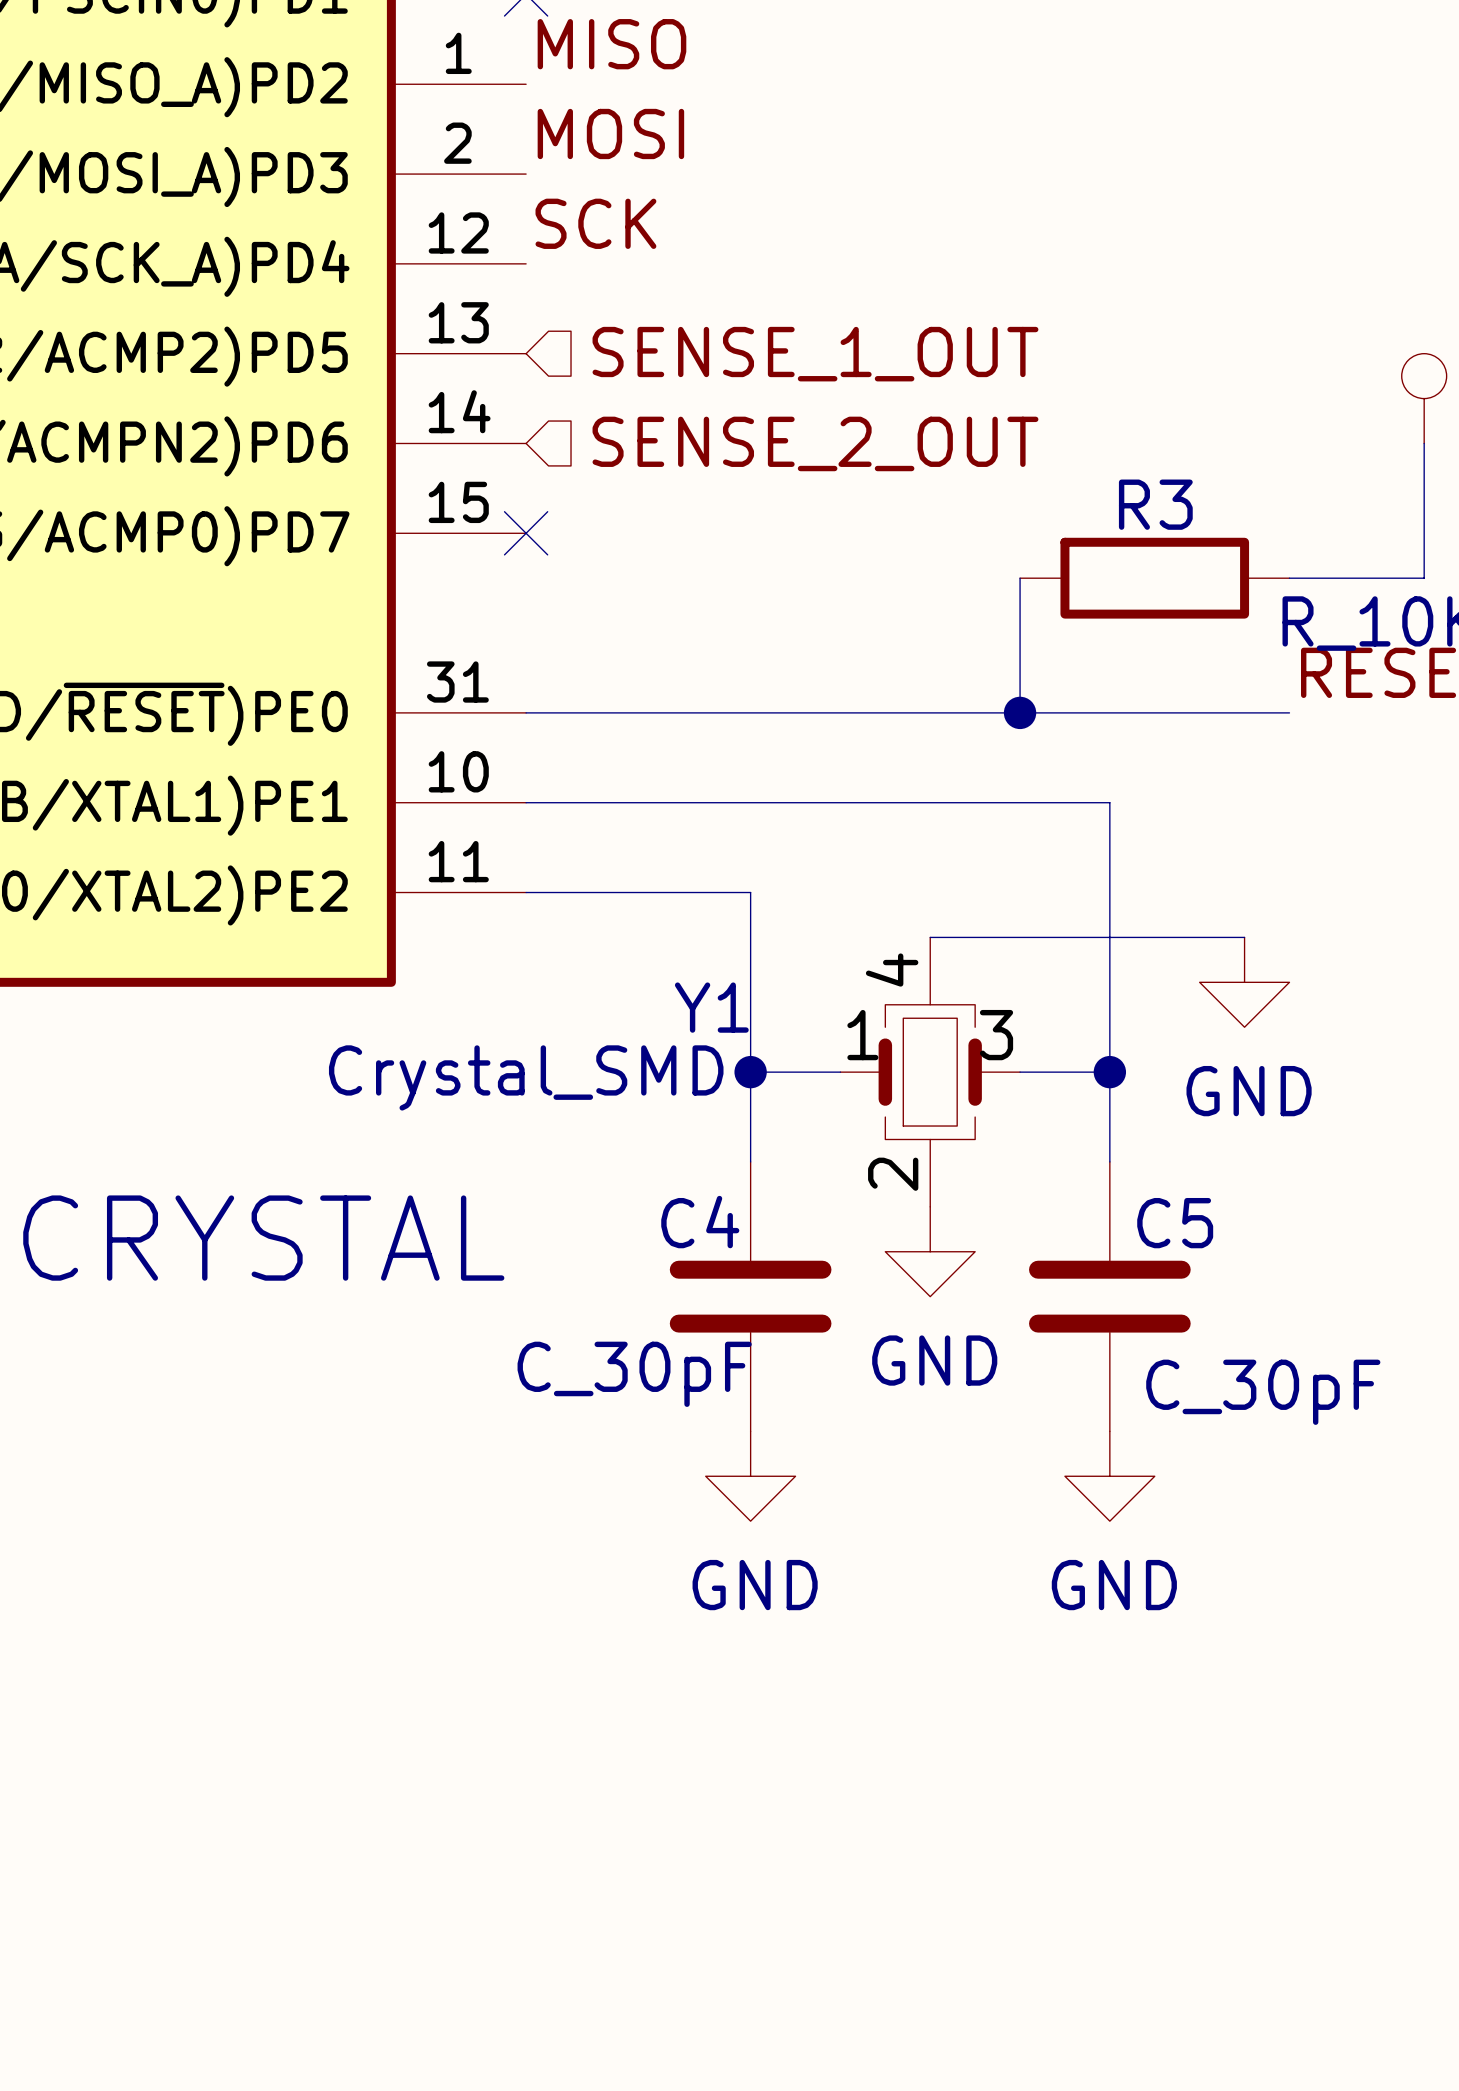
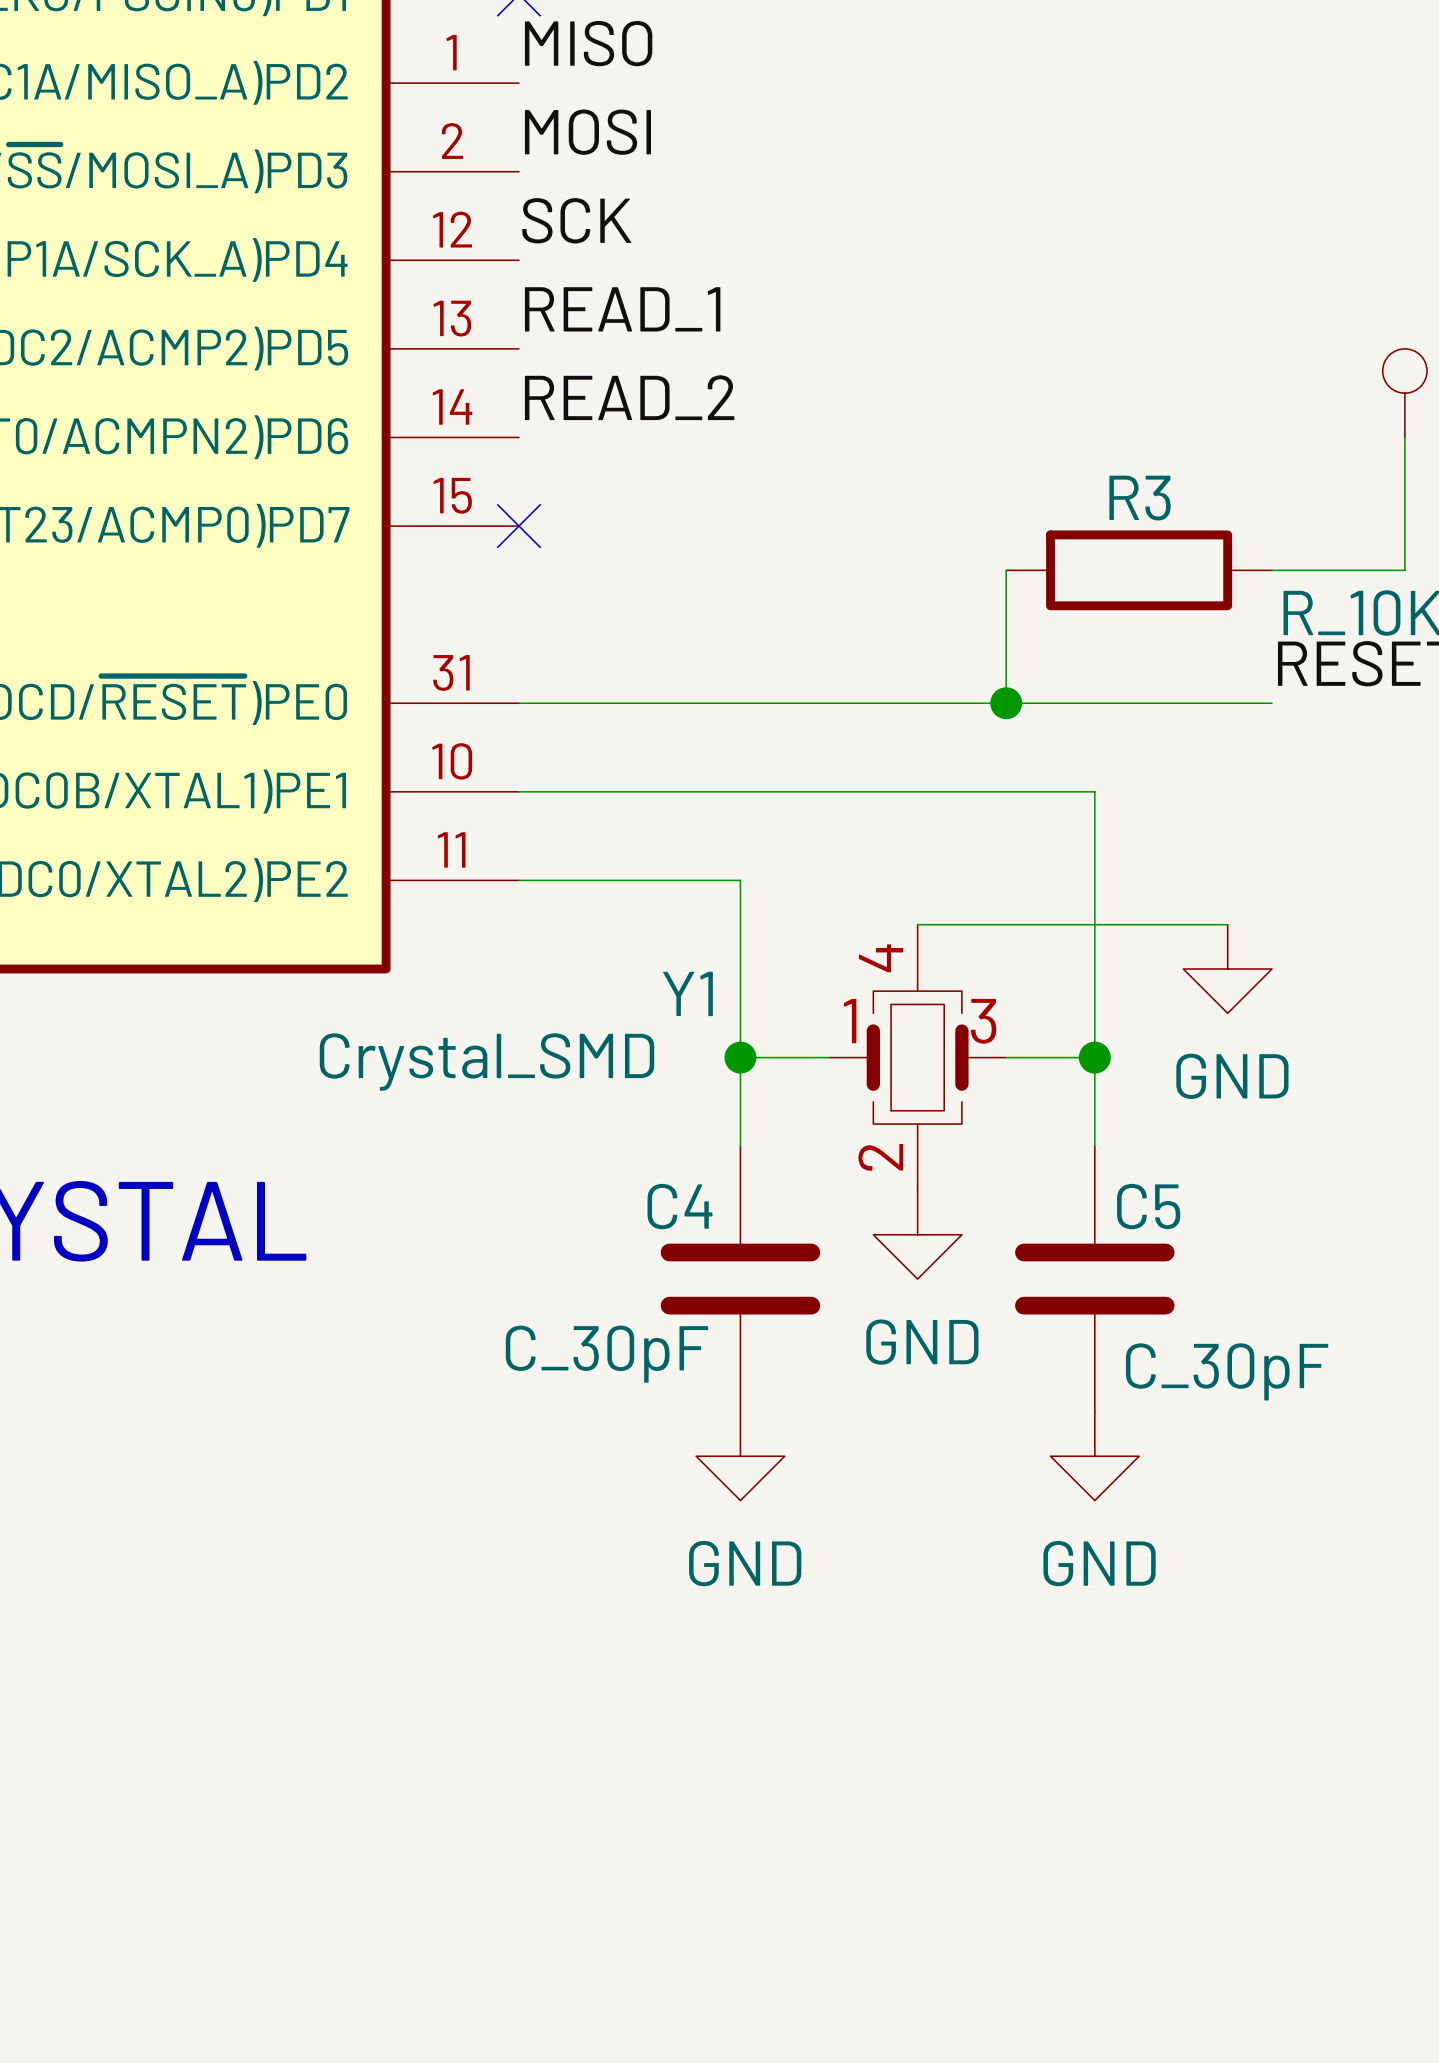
label: none -> READ_1 (622, 309)
hierarchical label: SENSE_1_OUT (815, 354) -> none
label: none -> READ_2 (629, 397)
hierarchical label: SENSE_2_OUT (815, 443) -> none

